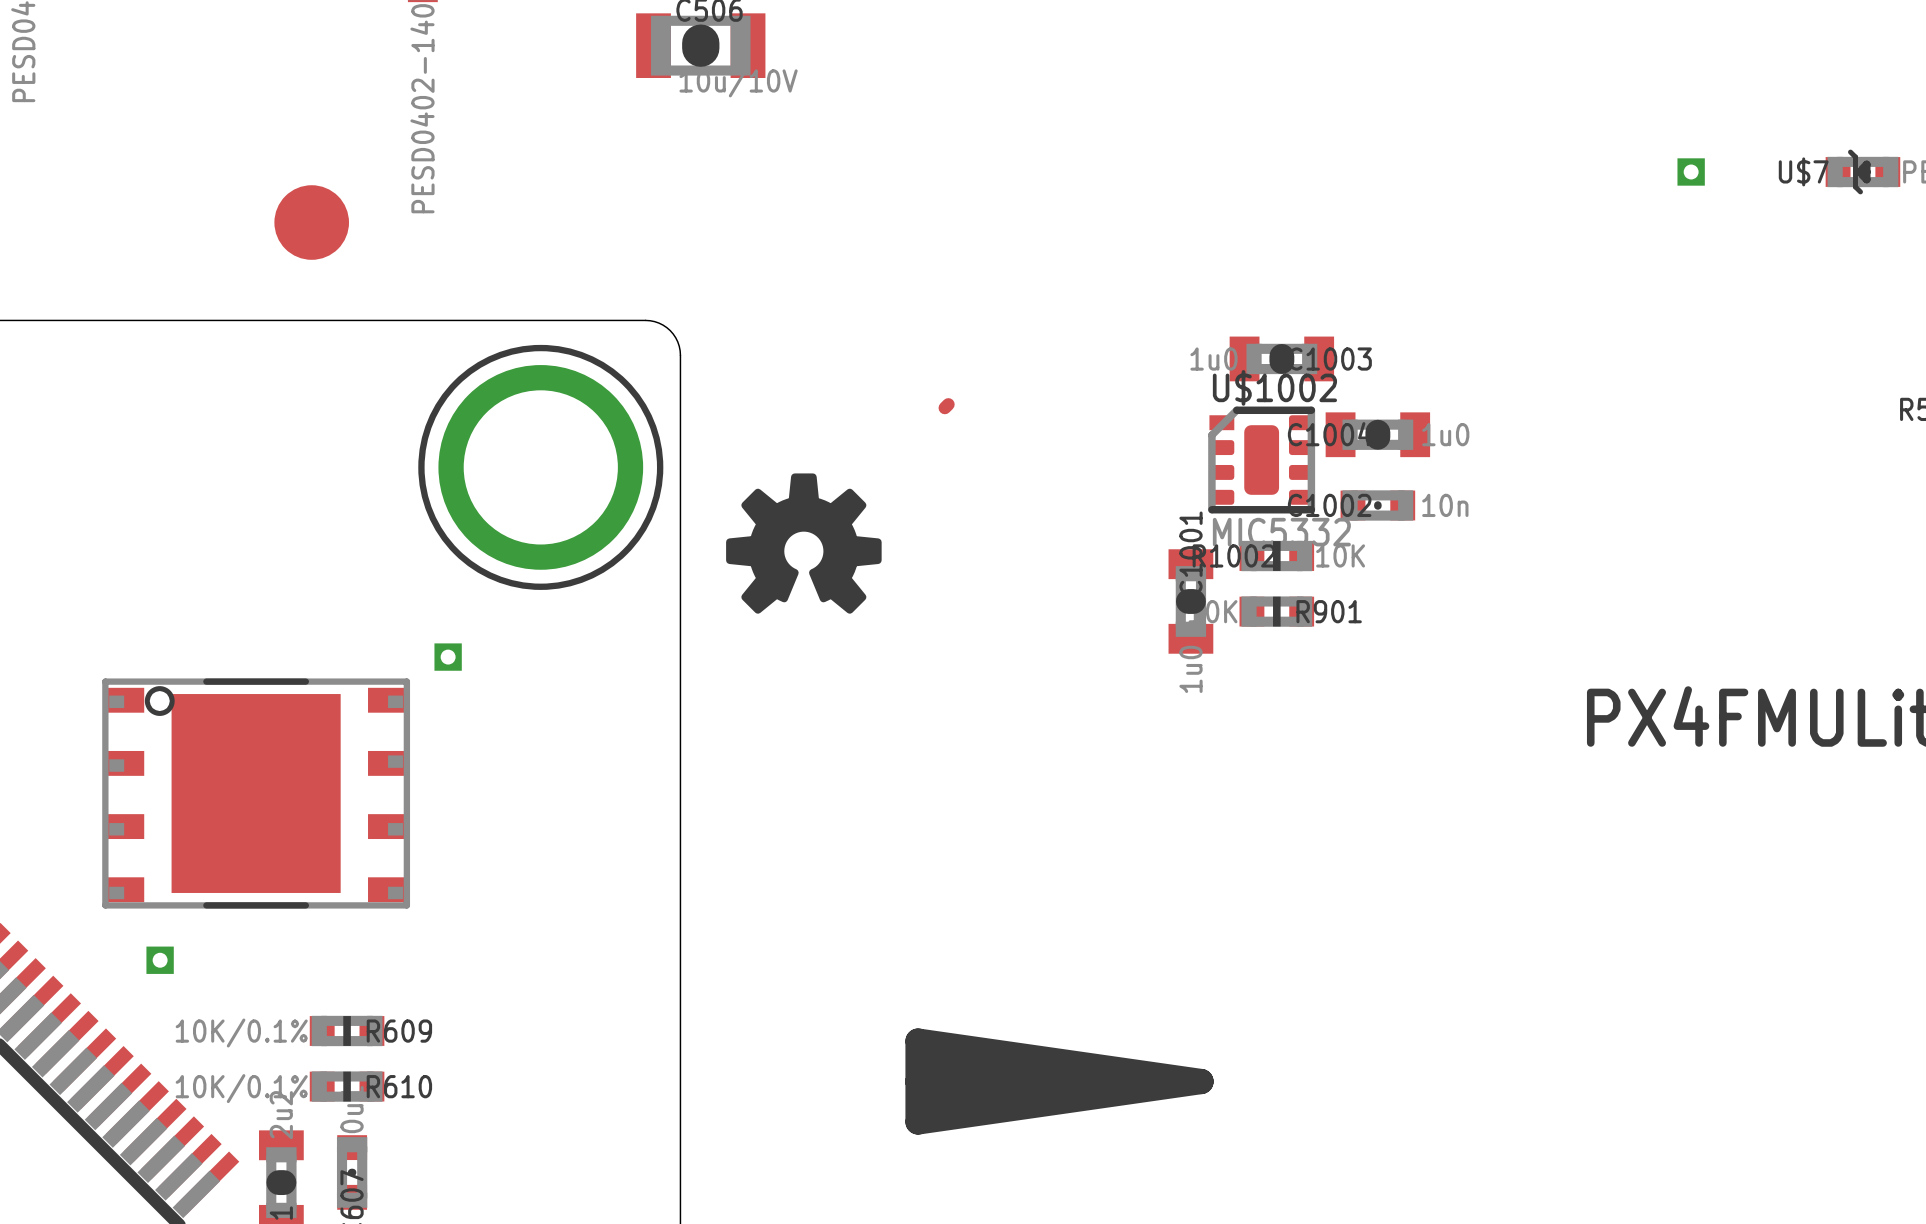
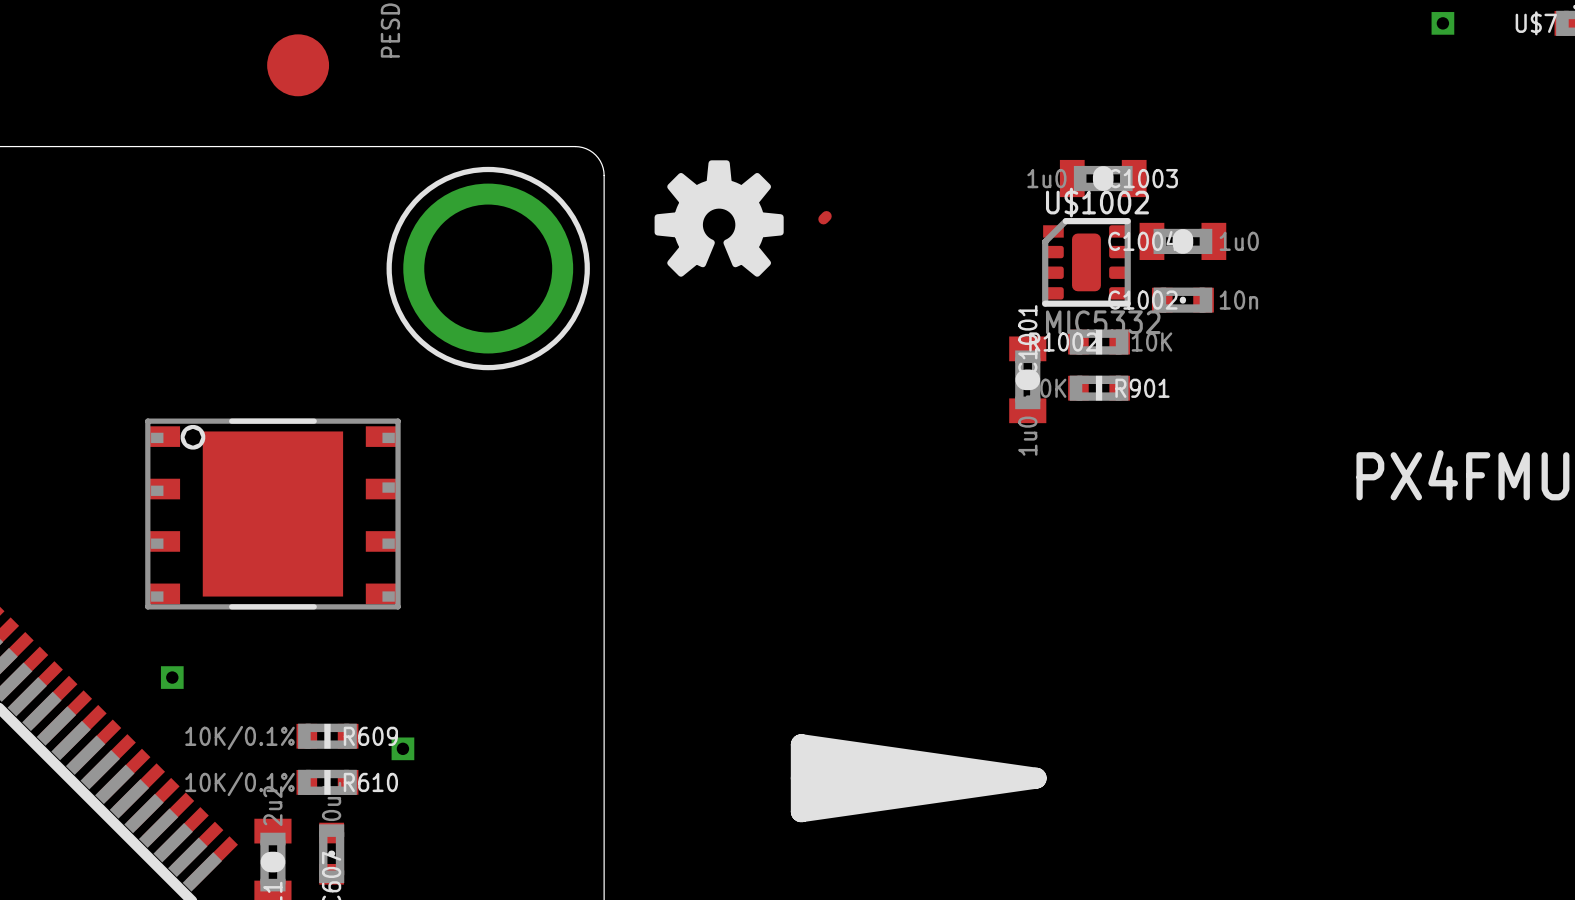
drawing position: (803, 543) -> (719, 218)
part position: (448, 657) -> (402, 748)
part position: (256, 793) -> (272, 514)

